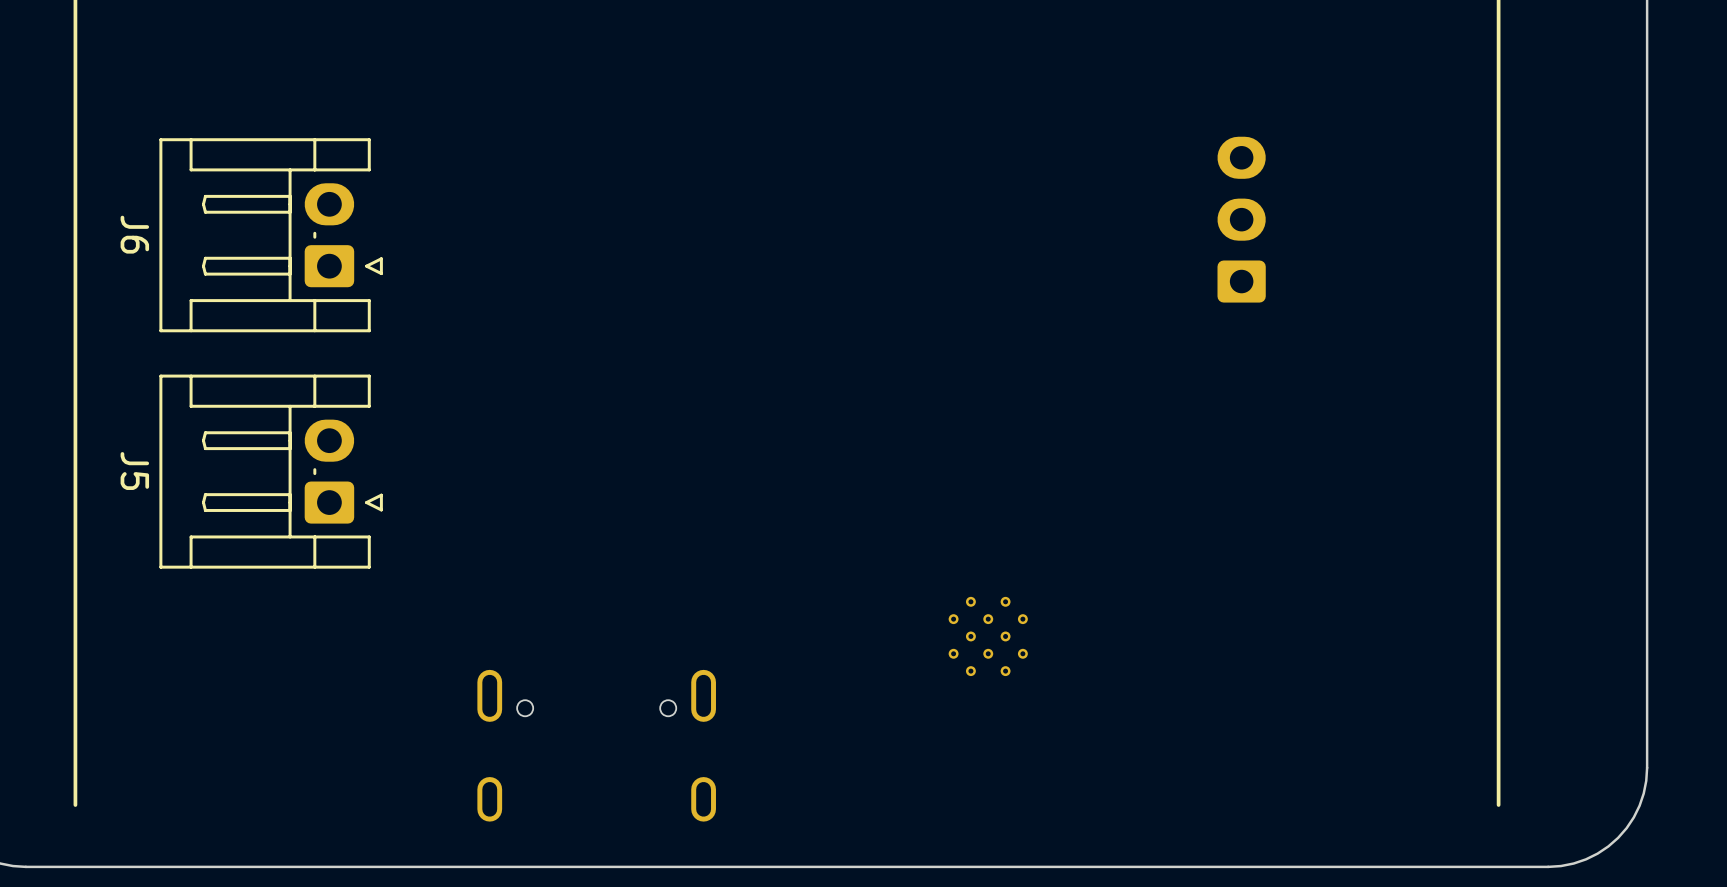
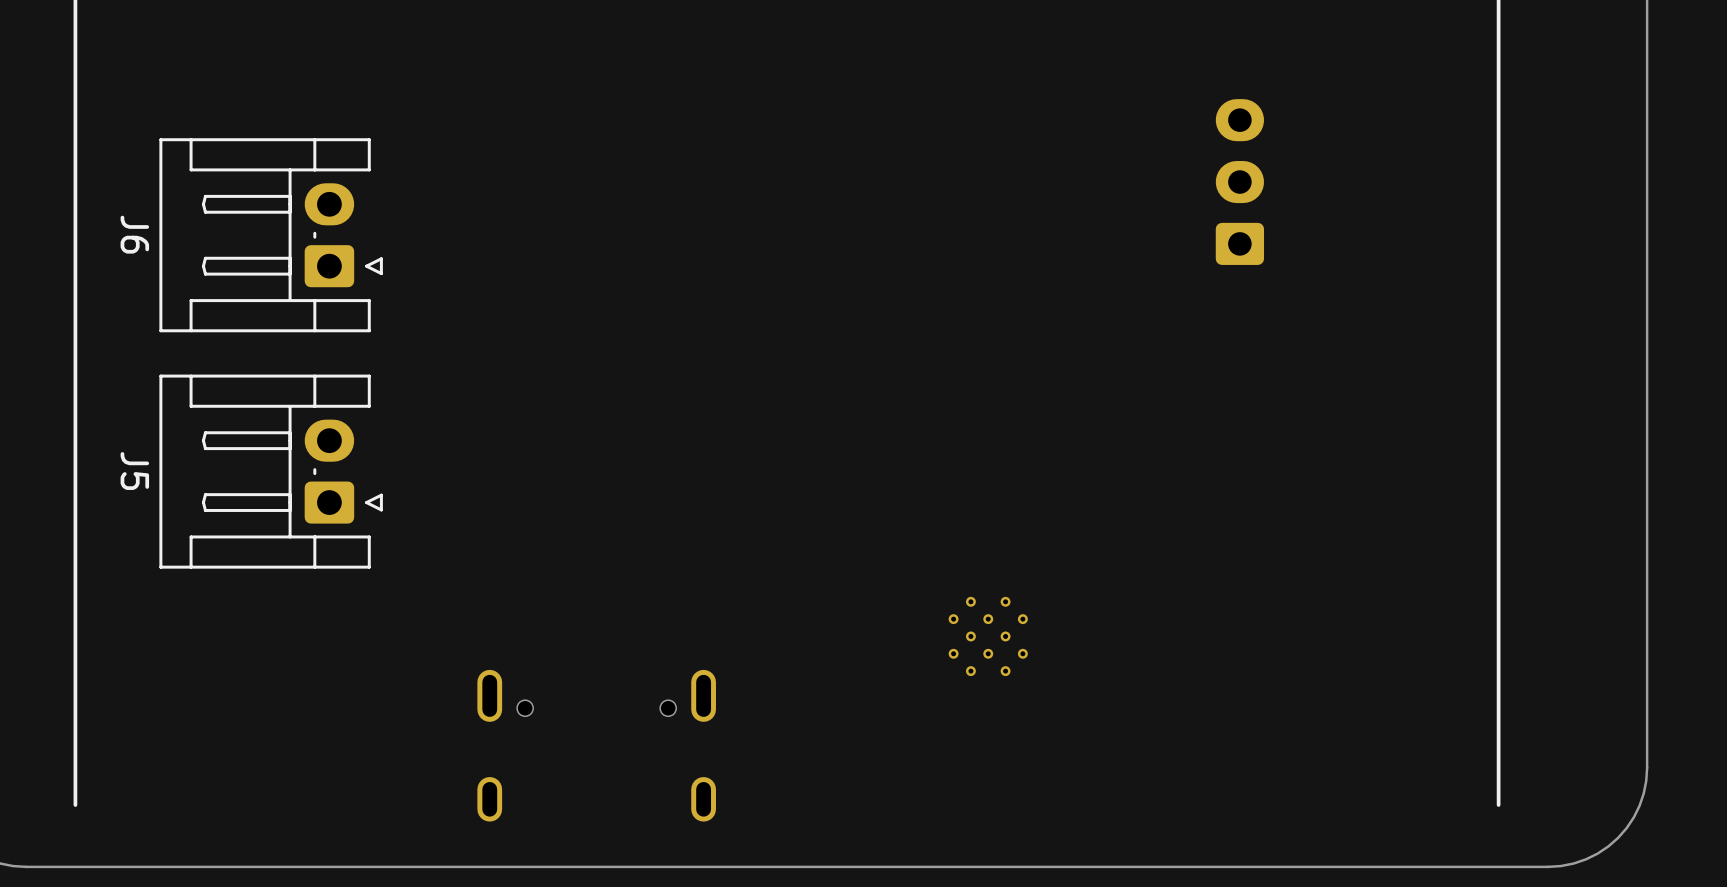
part position: (1241, 219) -> (1239, 182)

